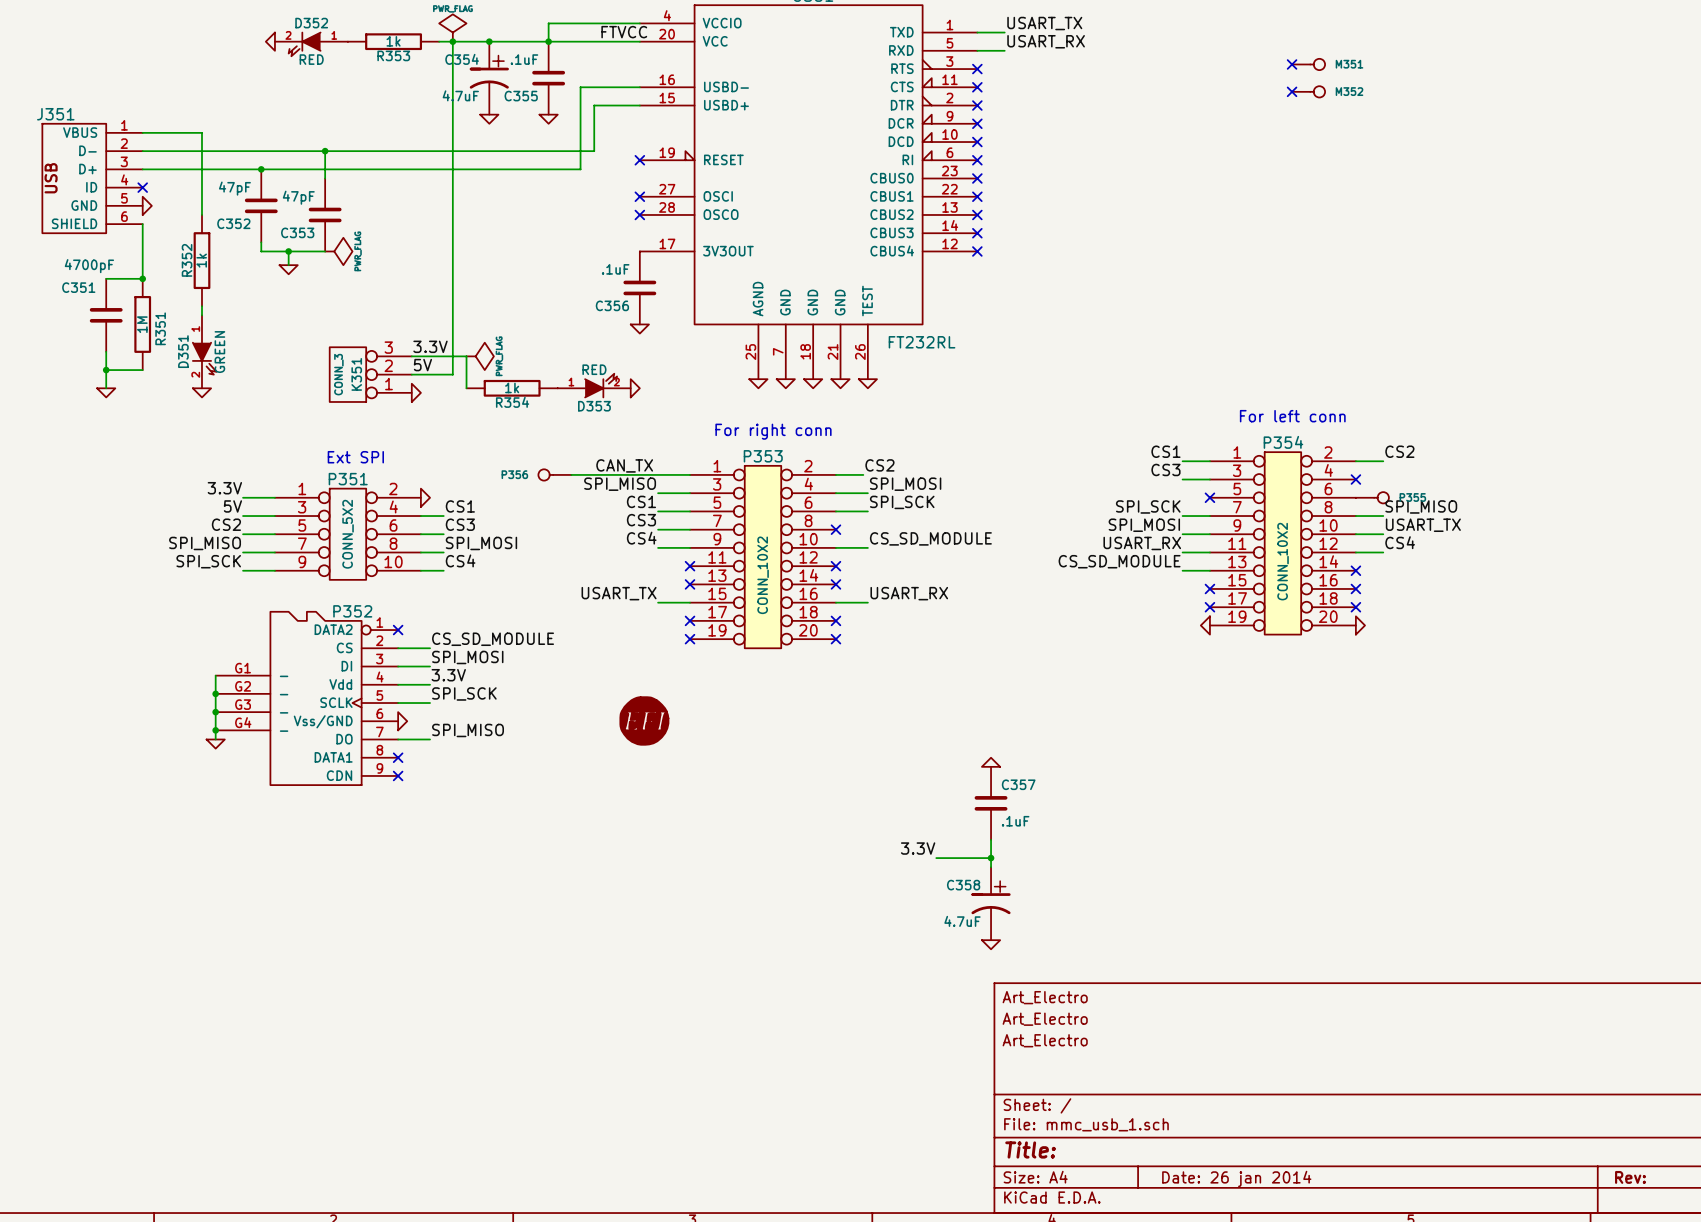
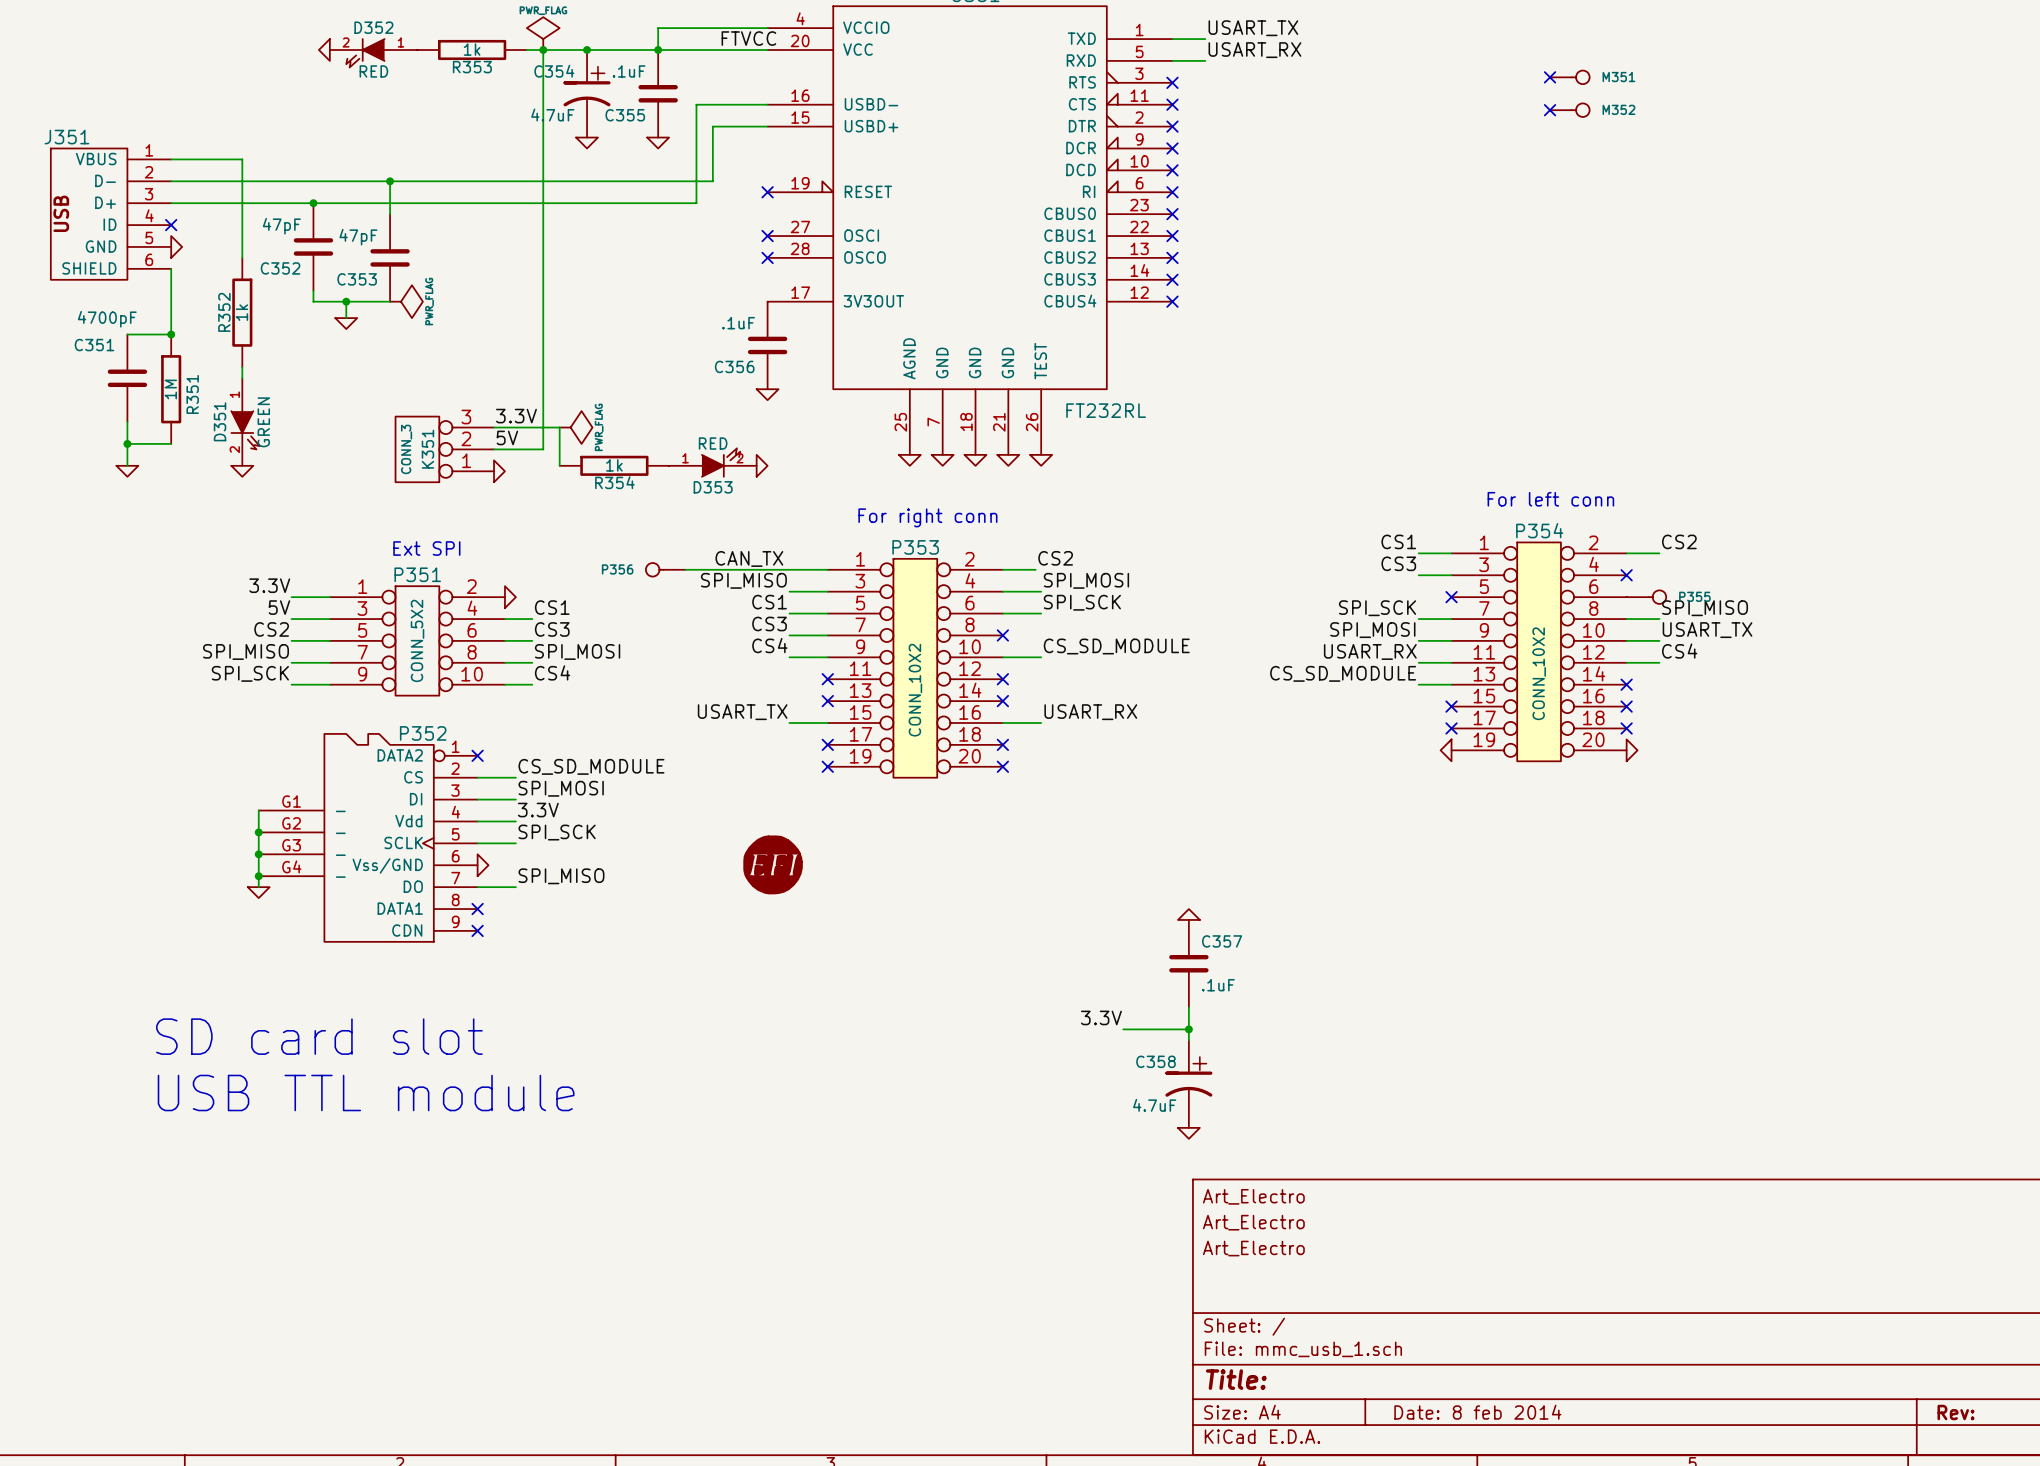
text: none -> SD card slot (319, 1036)
text: none -> USB TTL module (366, 1092)
title block: Date: 26 jan 2014 (1236, 1178) -> Date: 8 feb 2014 (1477, 1412)

